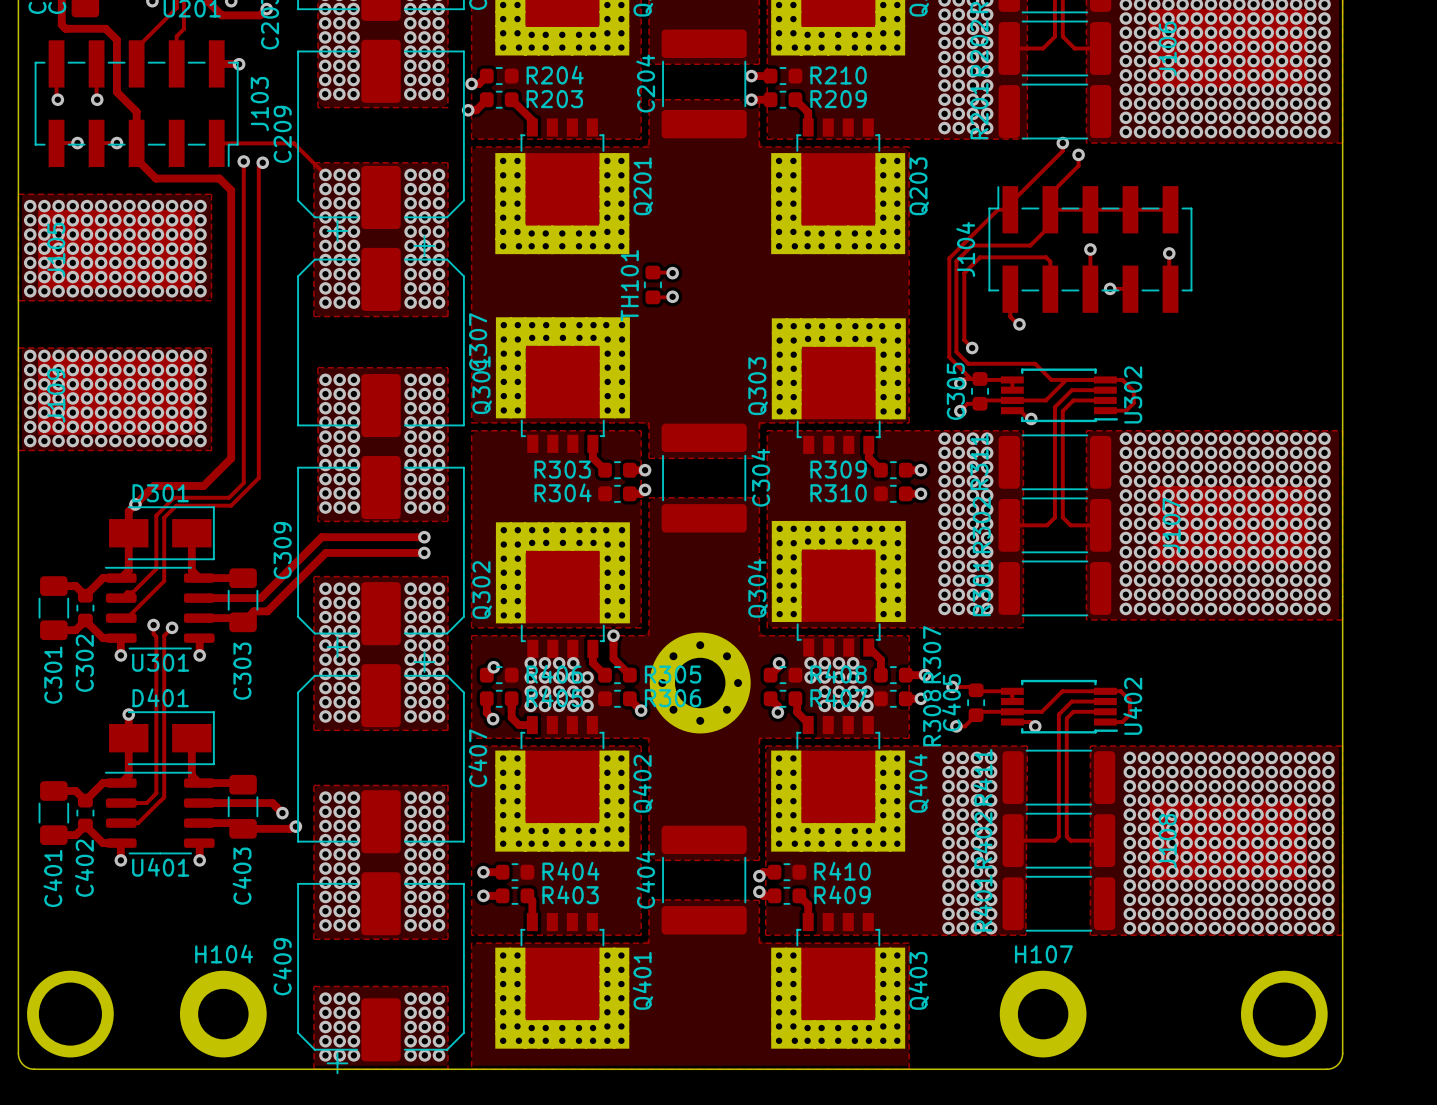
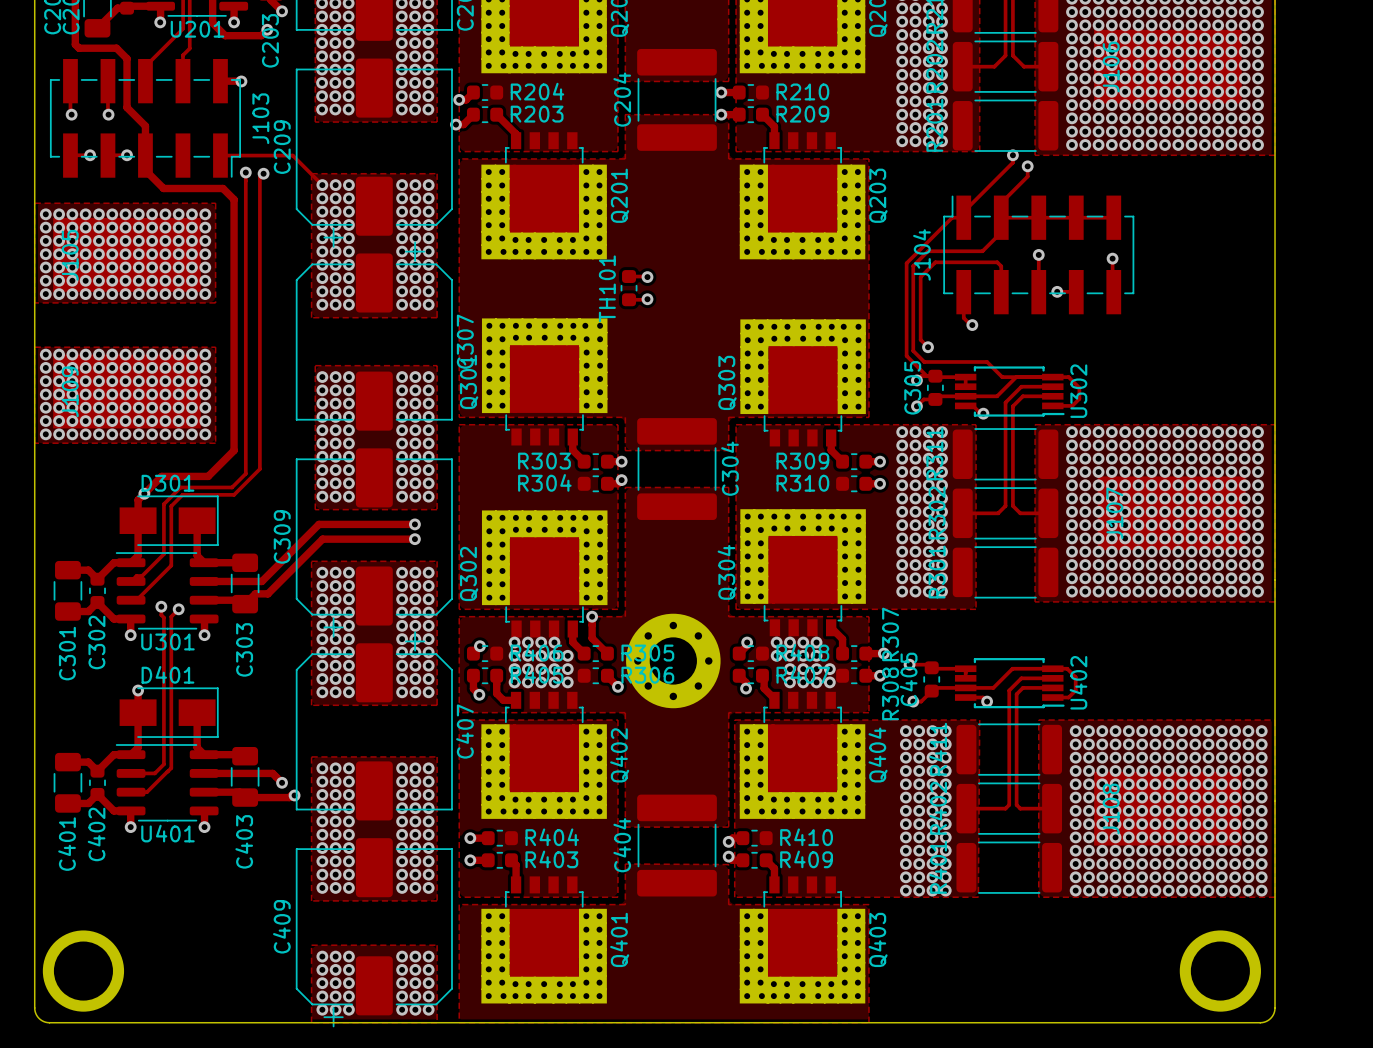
H104: (223, 1014) -> none
H107: (1043, 1014) -> none

